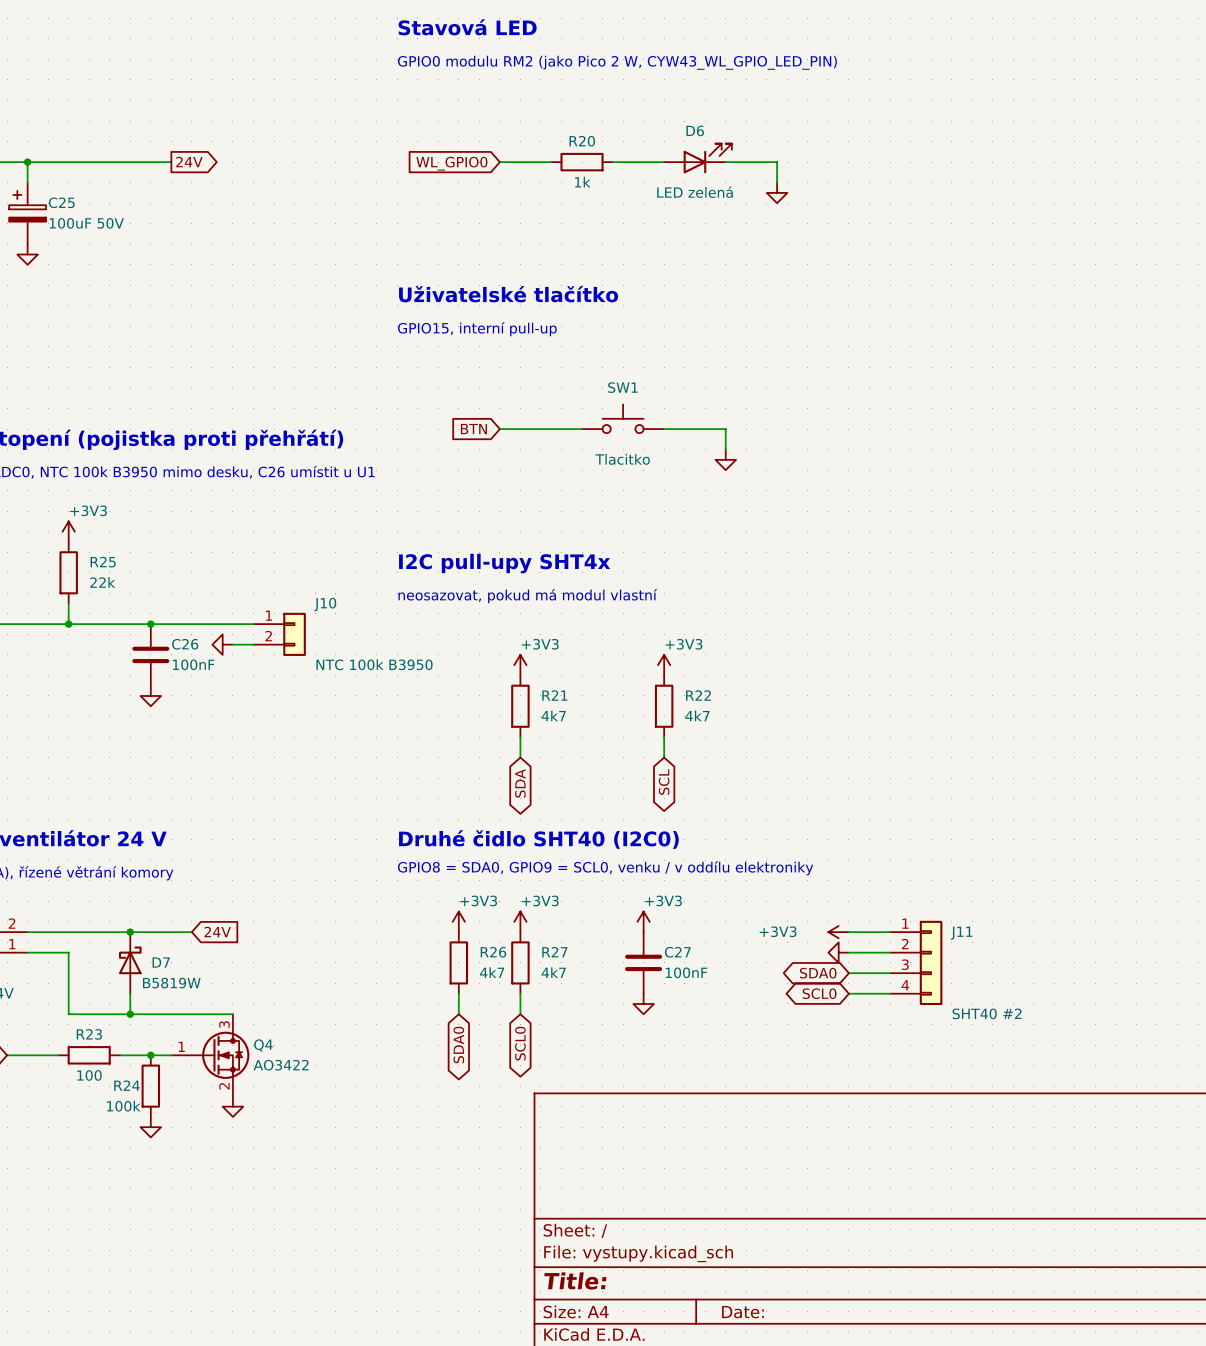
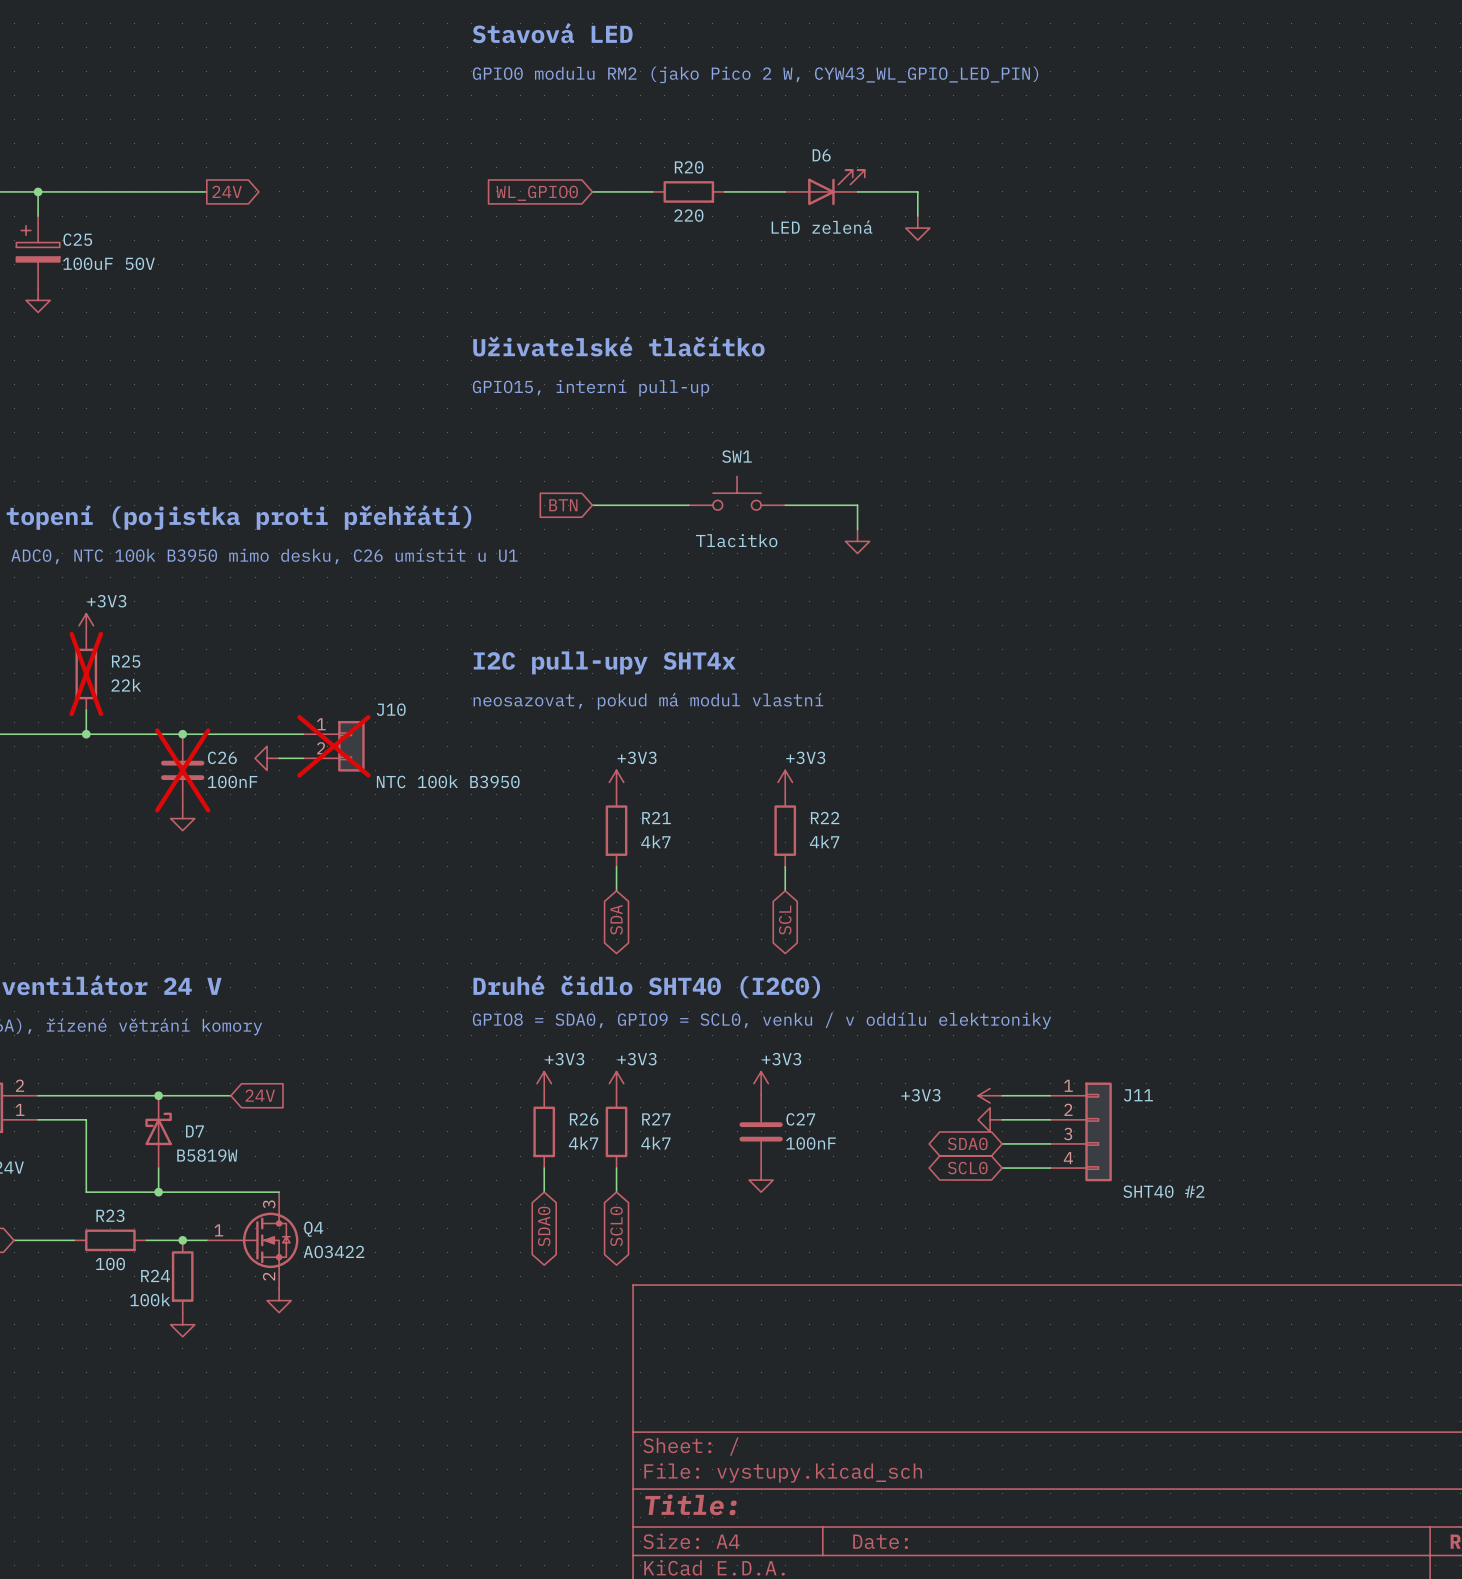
R20 value: 1k (582, 182) -> 220 (688, 215)
R25 do-not-place cross: none -> (86, 673)
J10 do-not-place cross: none -> (333, 746)
C26 do-not-place cross: none -> (182, 770)

